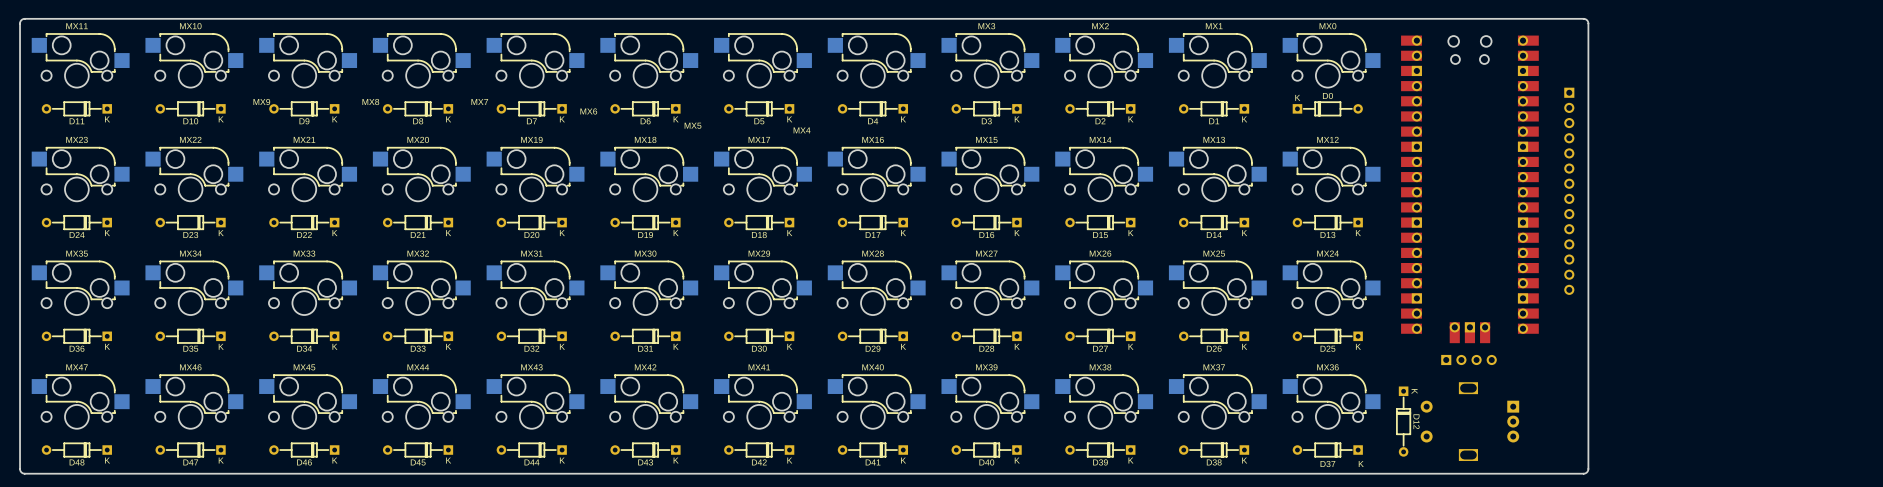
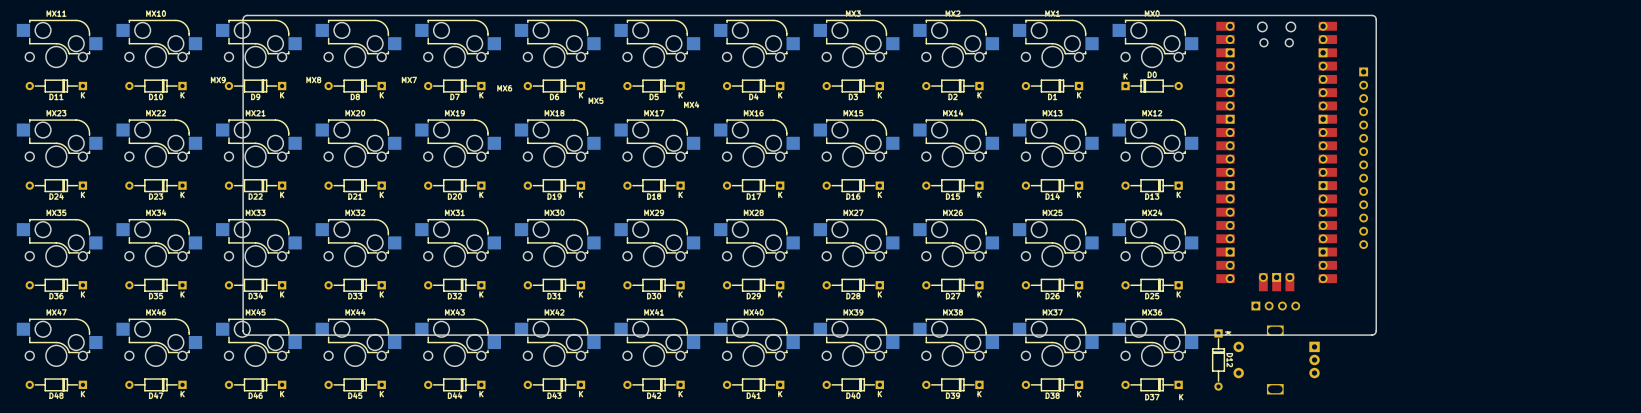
board edge: (1583, 18) (23, 18) (20, 23) (20, 470) (24, 473) (1584, 473) (1588, 468) (1588, 23) (1583, 18) -> (1372, 15) (1376, 19) (1376, 330) (1373, 334) (247, 335) (243, 331) (243, 19) (246, 15) (1372, 15)

